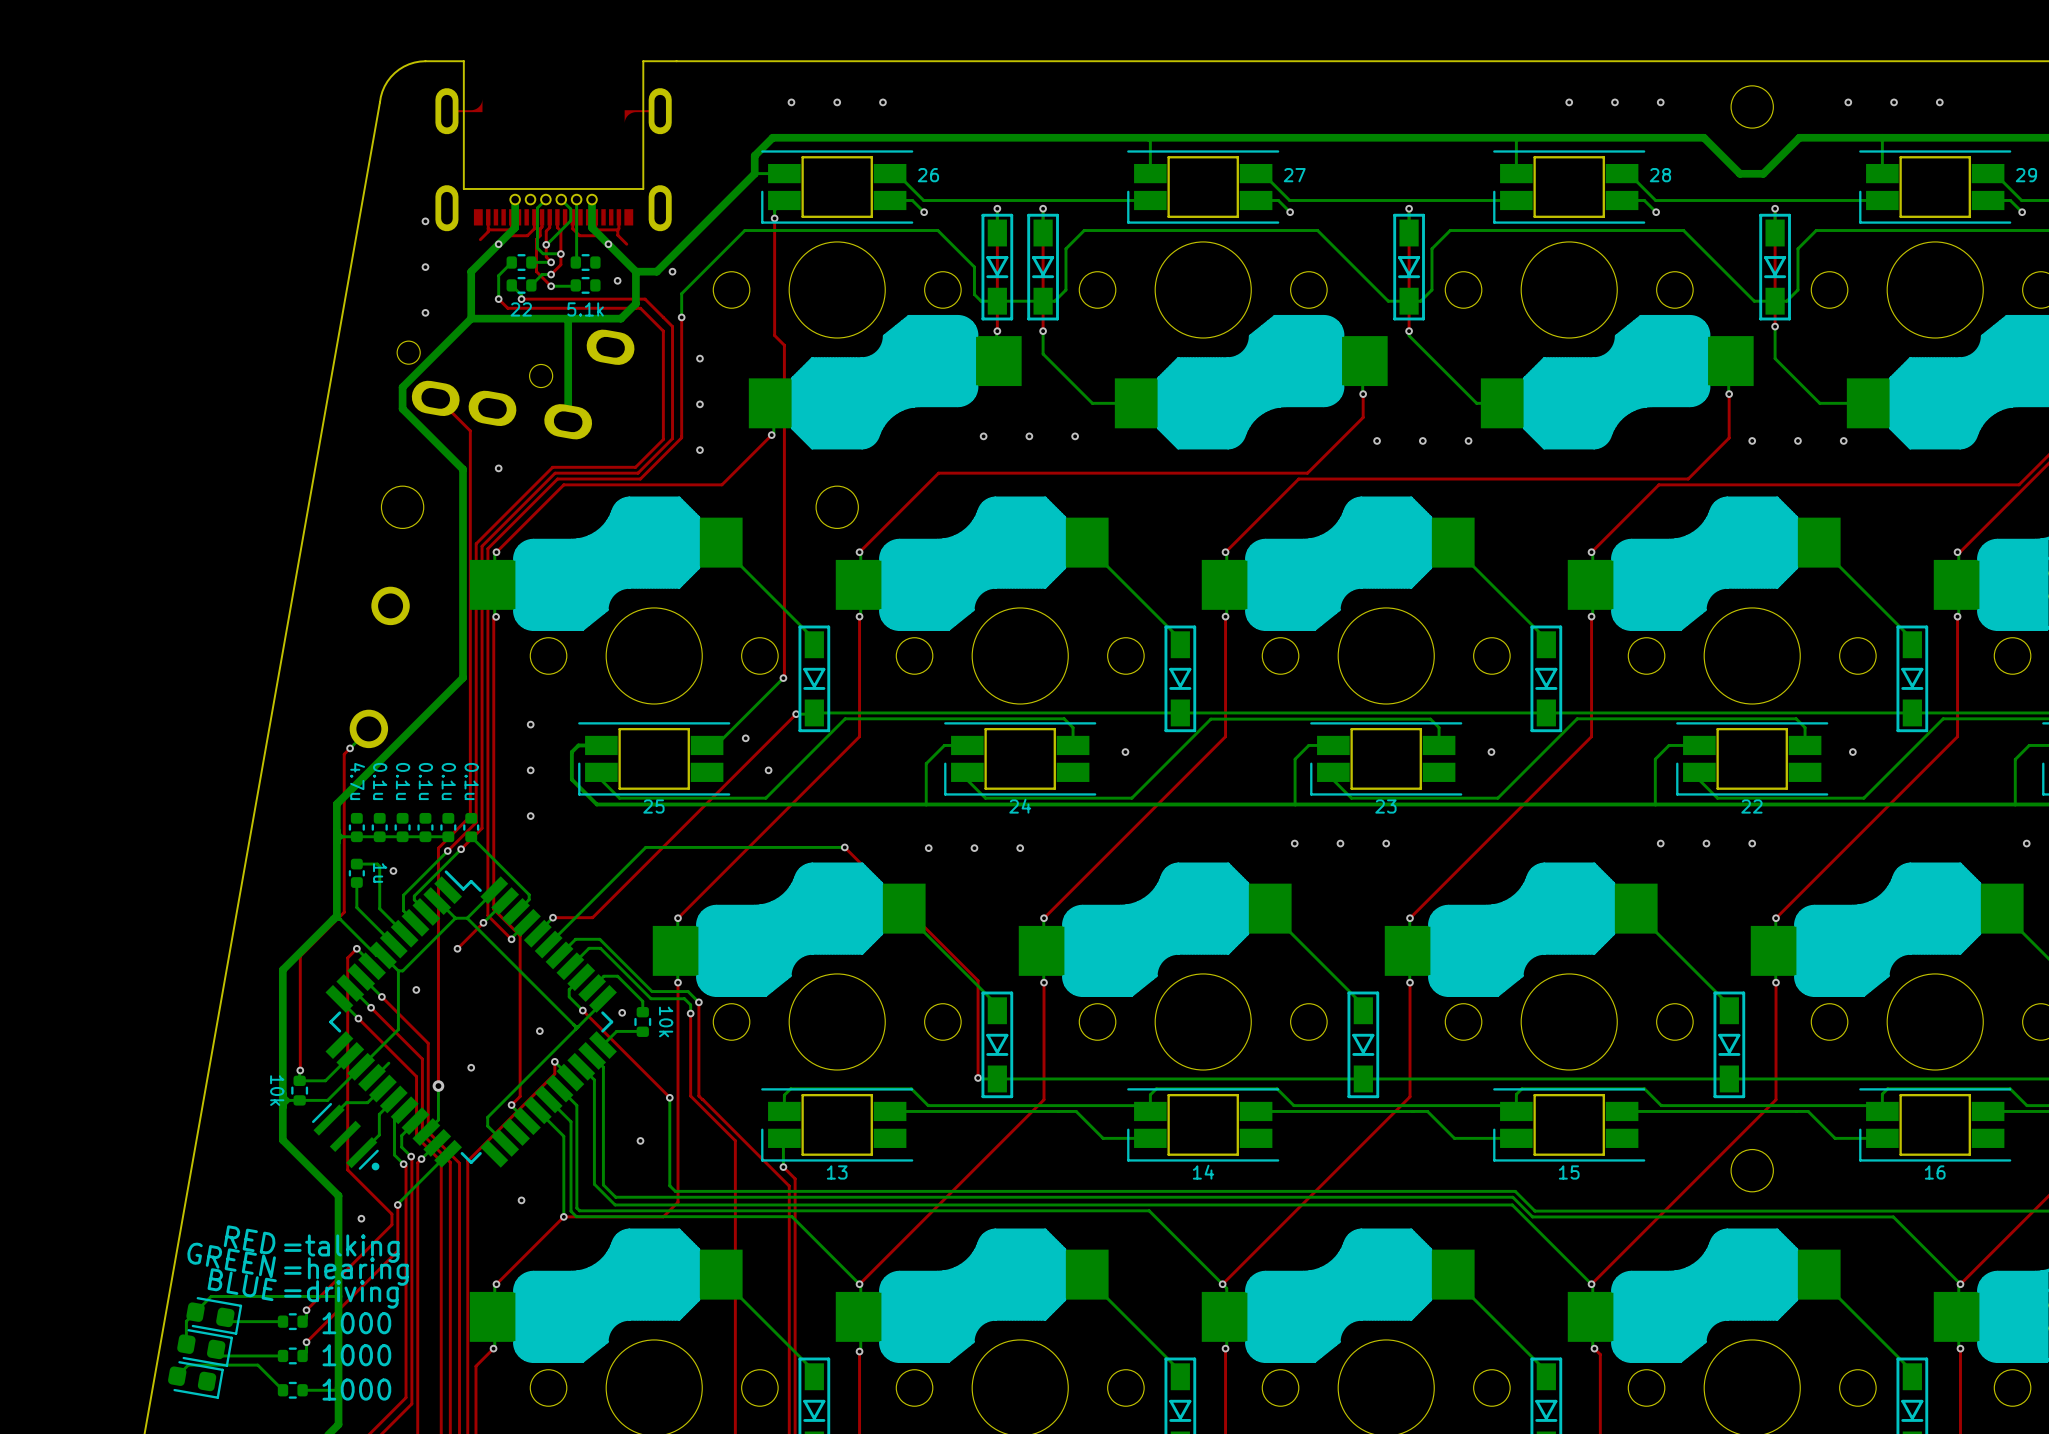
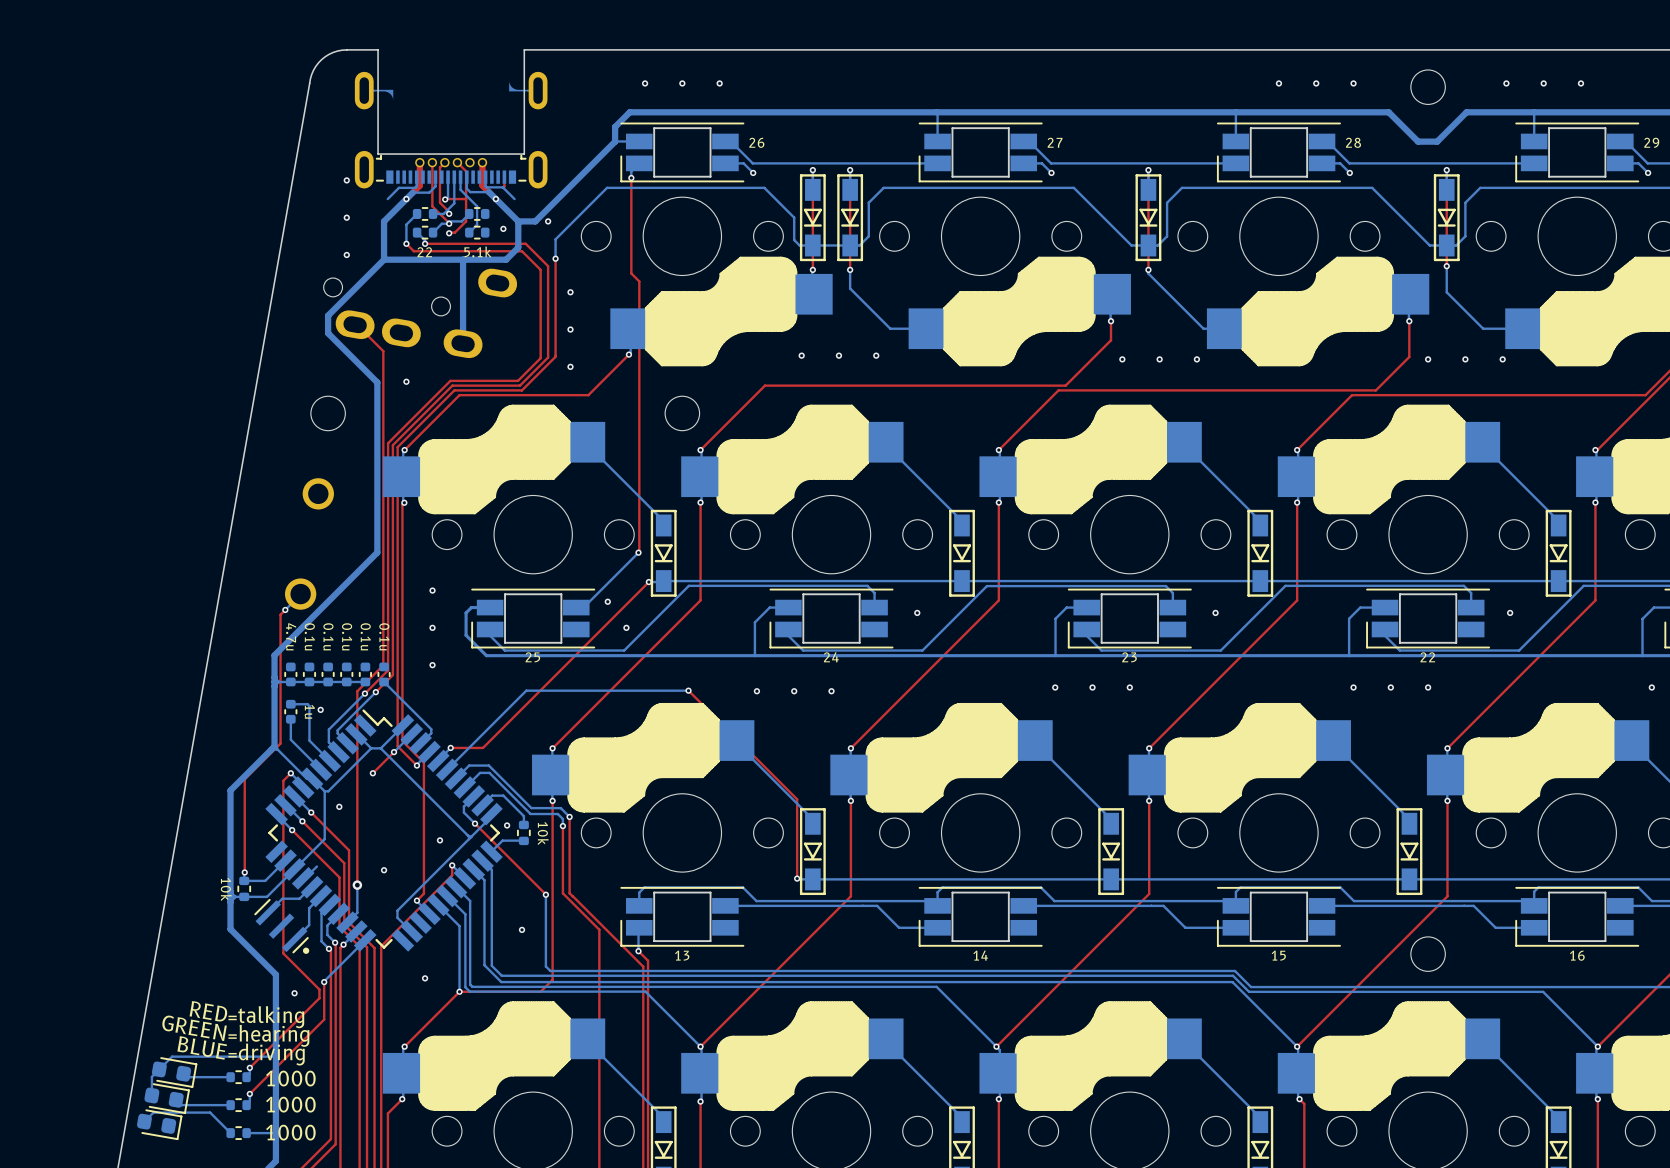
part side: top (556, 145) -> bottom (451, 118)
bottom track: (515, 199) (515, 227) (506, 236) -> (435, 177) (435, 186) (429, 192) (412, 192)
top track: none -> (432, 162) (432, 206) (447, 221)
bottom track: (545, 199) (537, 207) (537, 248) (543, 253) (560, 254) -> none
top track: none -> (444, 162) (439, 167) (439, 202) (447, 210)
bottom track: (561, 199) (570, 209) (570, 220) (546, 244) -> none
top track: none -> (457, 162) (466, 171) (466, 221) (454, 232) (447, 232)
bottom track: (576, 199) (576, 261) -> none
bottom track: (591, 199) (591, 227) (599, 235) -> (466, 177) (466, 188) (470, 192) (489, 192)
top track: (488, 217) (488, 231) (480, 239) -> none
bottom track: none -> (416, 177) (415, 187) (398, 187) (387, 199)
top track: (511, 217) (510, 229) (488, 228) -> none
top track: (534, 217) (534, 228) (527, 235) (507, 235) -> (419, 162) (419, 185) (413, 192)
top track: (542, 217) (540, 235) (536, 239) (536, 271) (551, 286) -> none
bottom track: none -> (448, 177) (447, 199)
top track: (549, 217) (549, 227) (546, 231) (546, 256) (551, 262) -> none
top track: (557, 217) (557, 227) (560, 231) (560, 264) (551, 274) -> none
bottom track: none -> (460, 177) (460, 189) (477, 206) (477, 224) (469, 232)
top track: (572, 217) (572, 228) (579, 235) (599, 235) -> (482, 162) (482, 185) (489, 192)
bottom track: none -> (485, 177) (486, 187) (503, 187) (514, 199)
top track: (595, 217) (596, 229) (617, 229) (617, 235) (626, 244) -> none
top track: none -> (466, 199) (447, 199)
via: (560, 254) -> none
bottom track: (551, 262) (531, 262) -> (454, 177) (454, 203) (443, 213) (433, 213)
bottom track: none -> (469, 213) (461, 221) (447, 221)
bottom track: (574, 286) (551, 286) -> none

